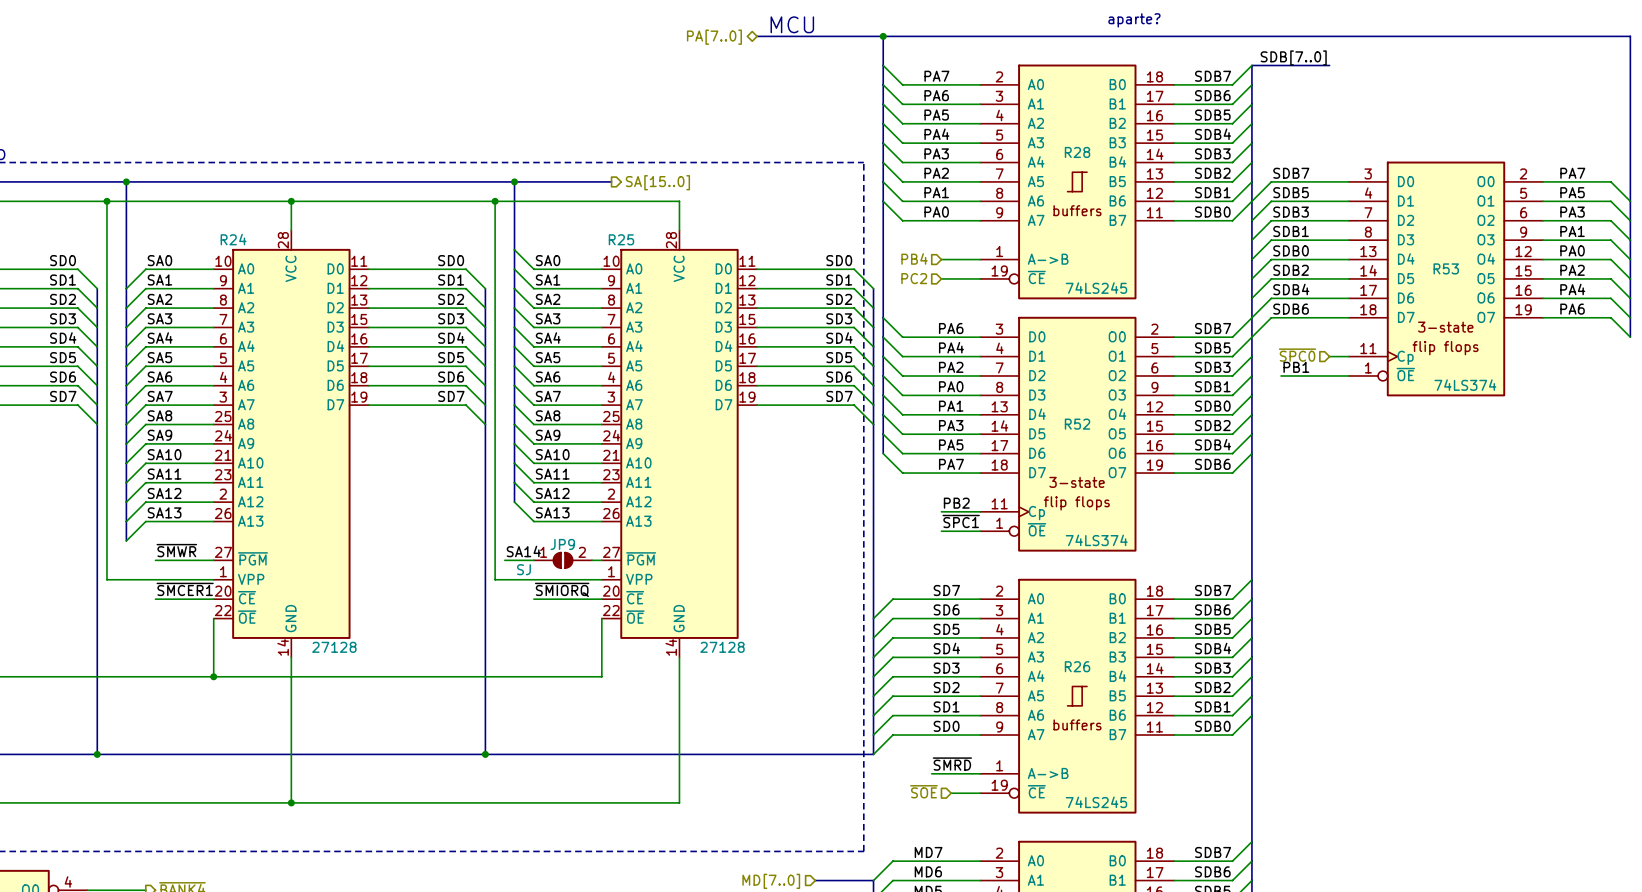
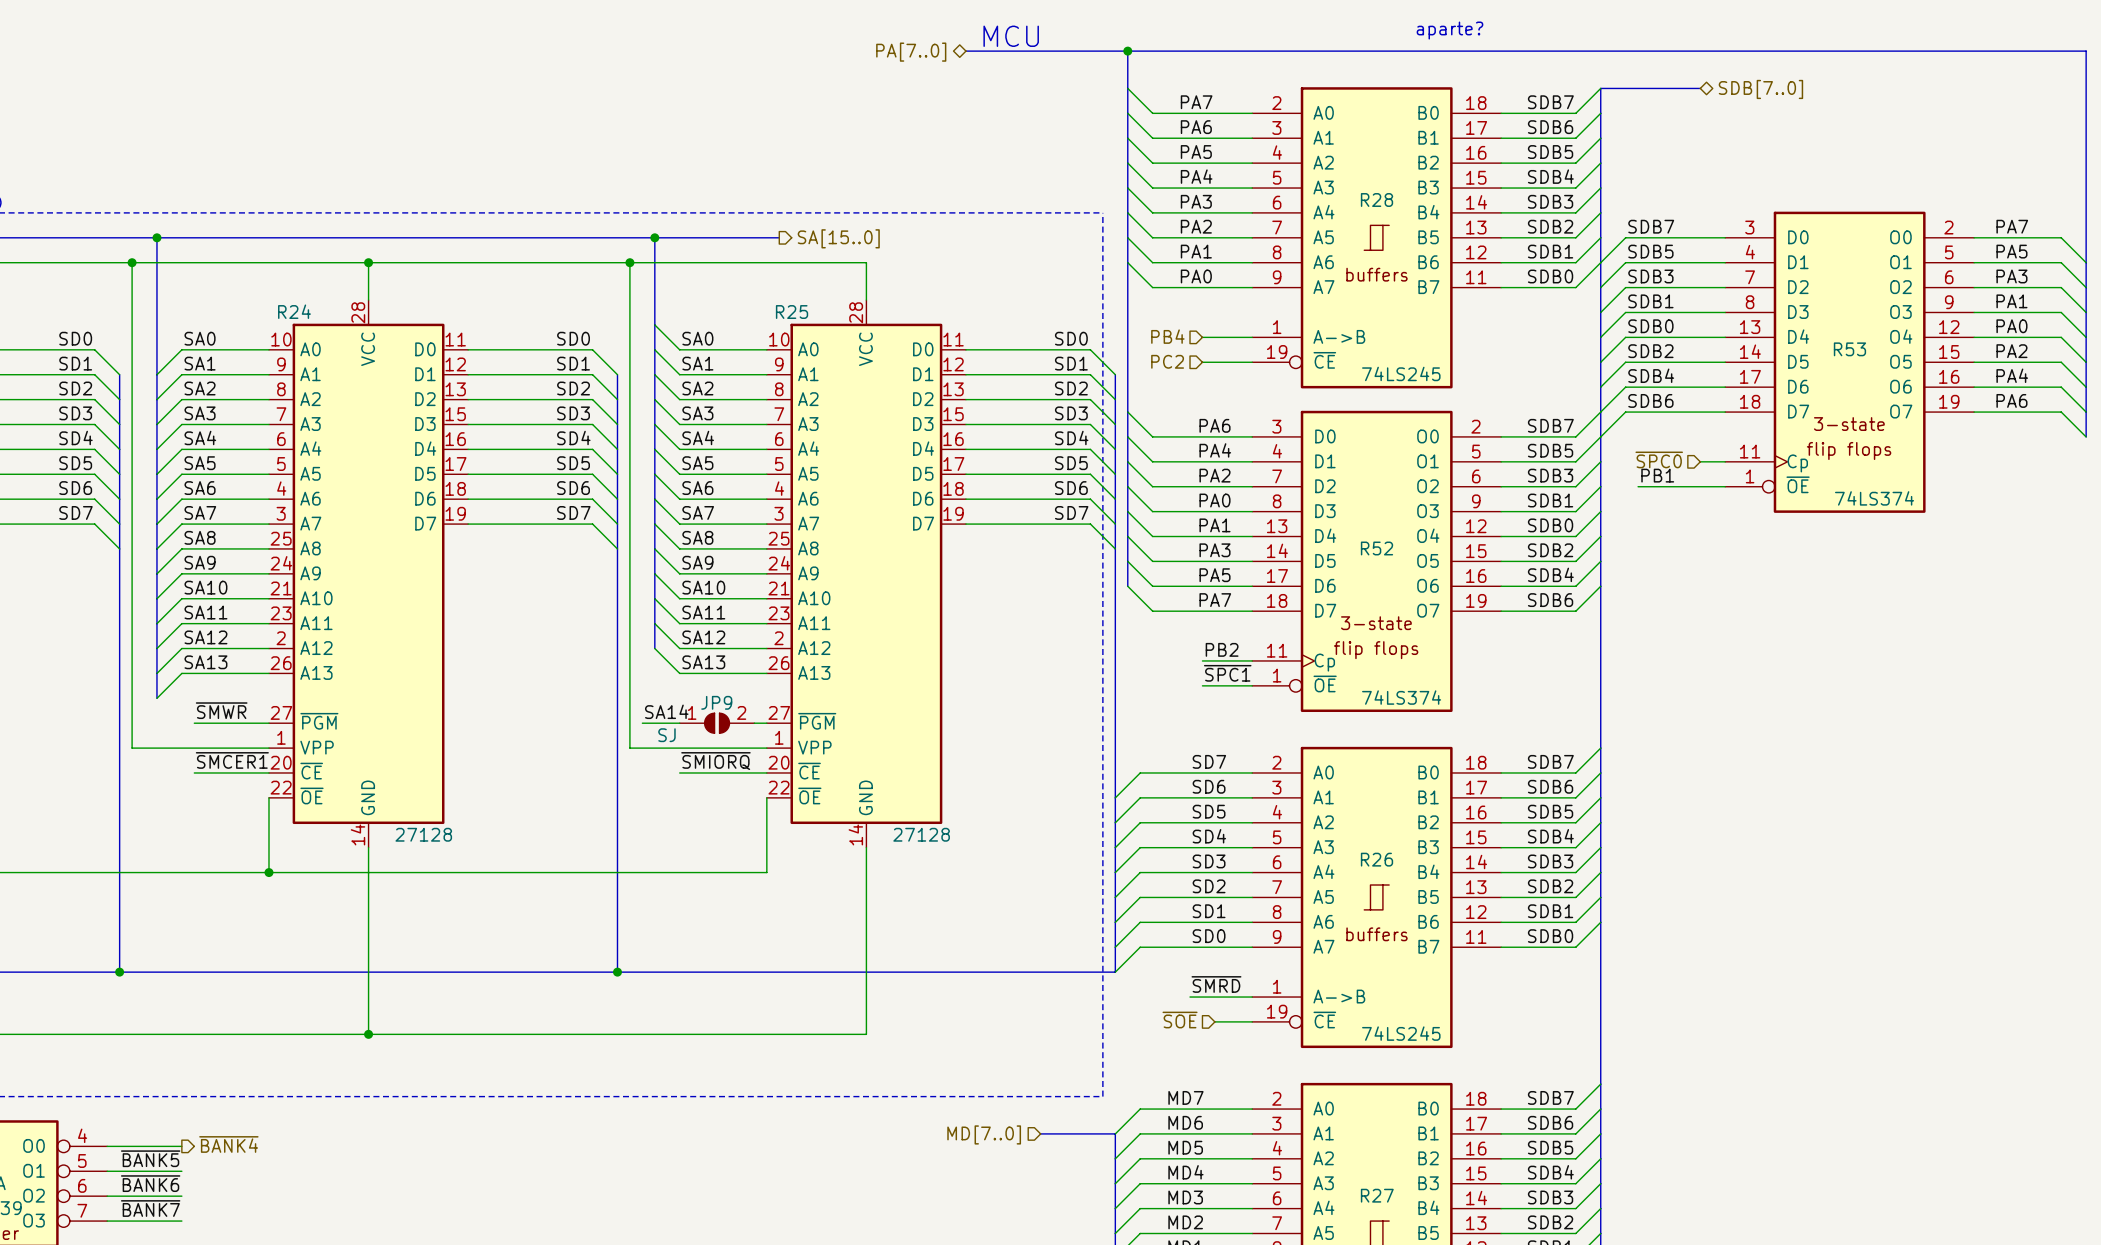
label: SDB[7..0] (1293, 57) -> none
hierarchical label: none -> SDB[7..0] (1760, 89)

